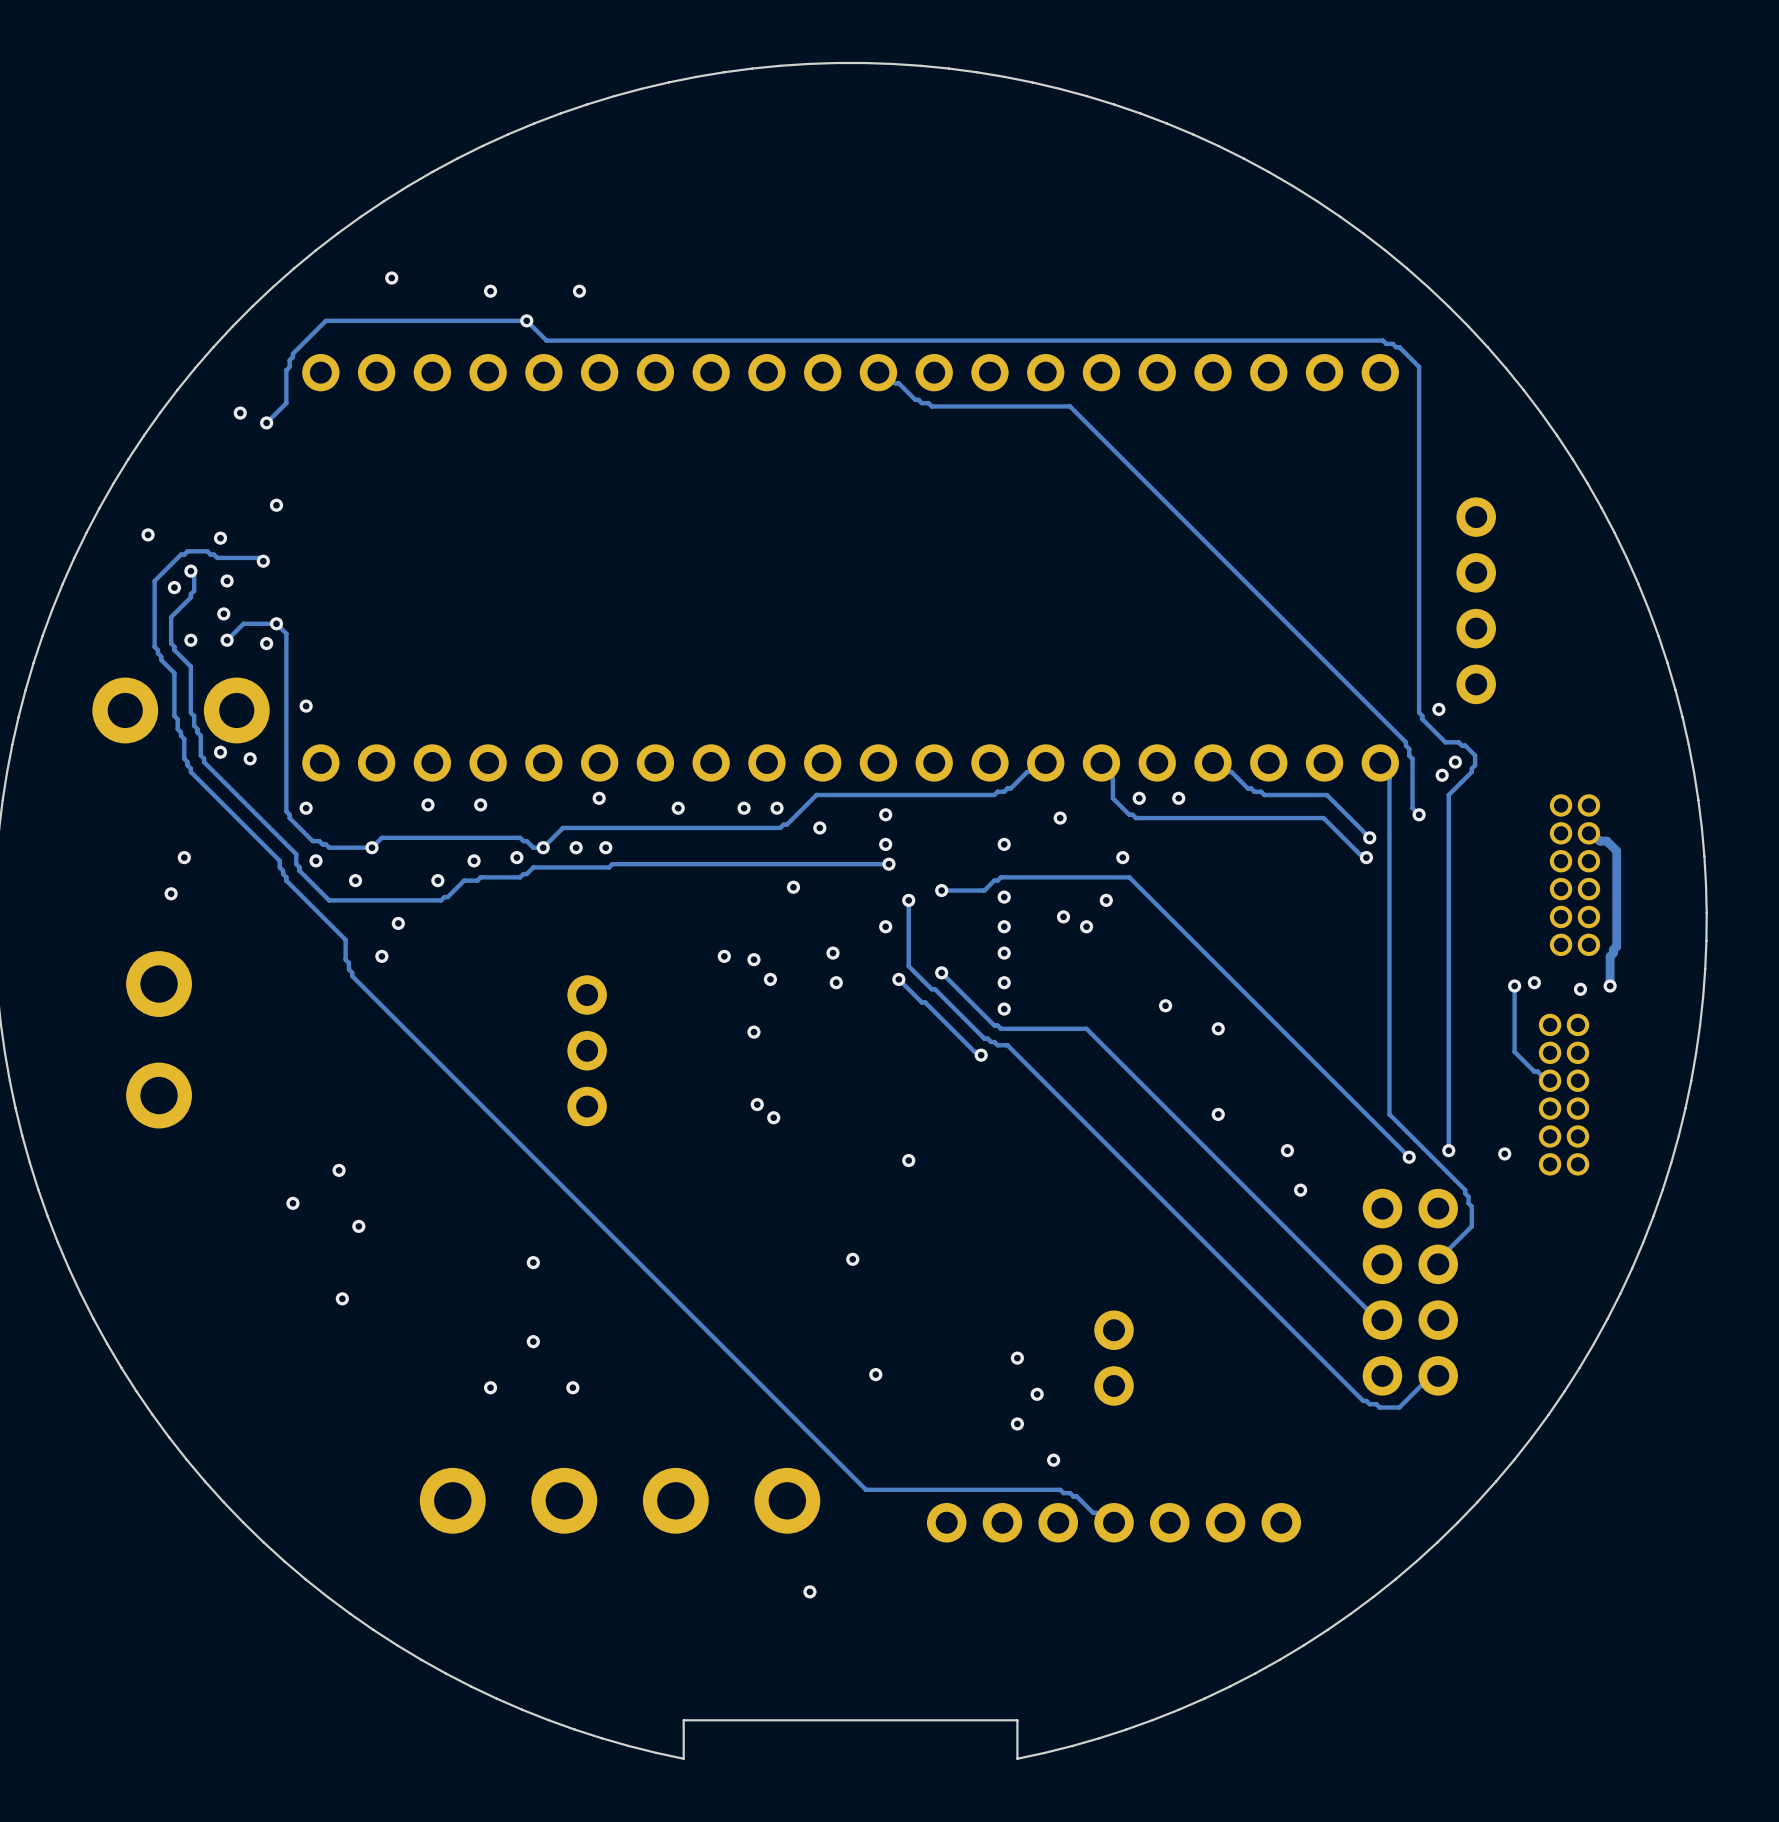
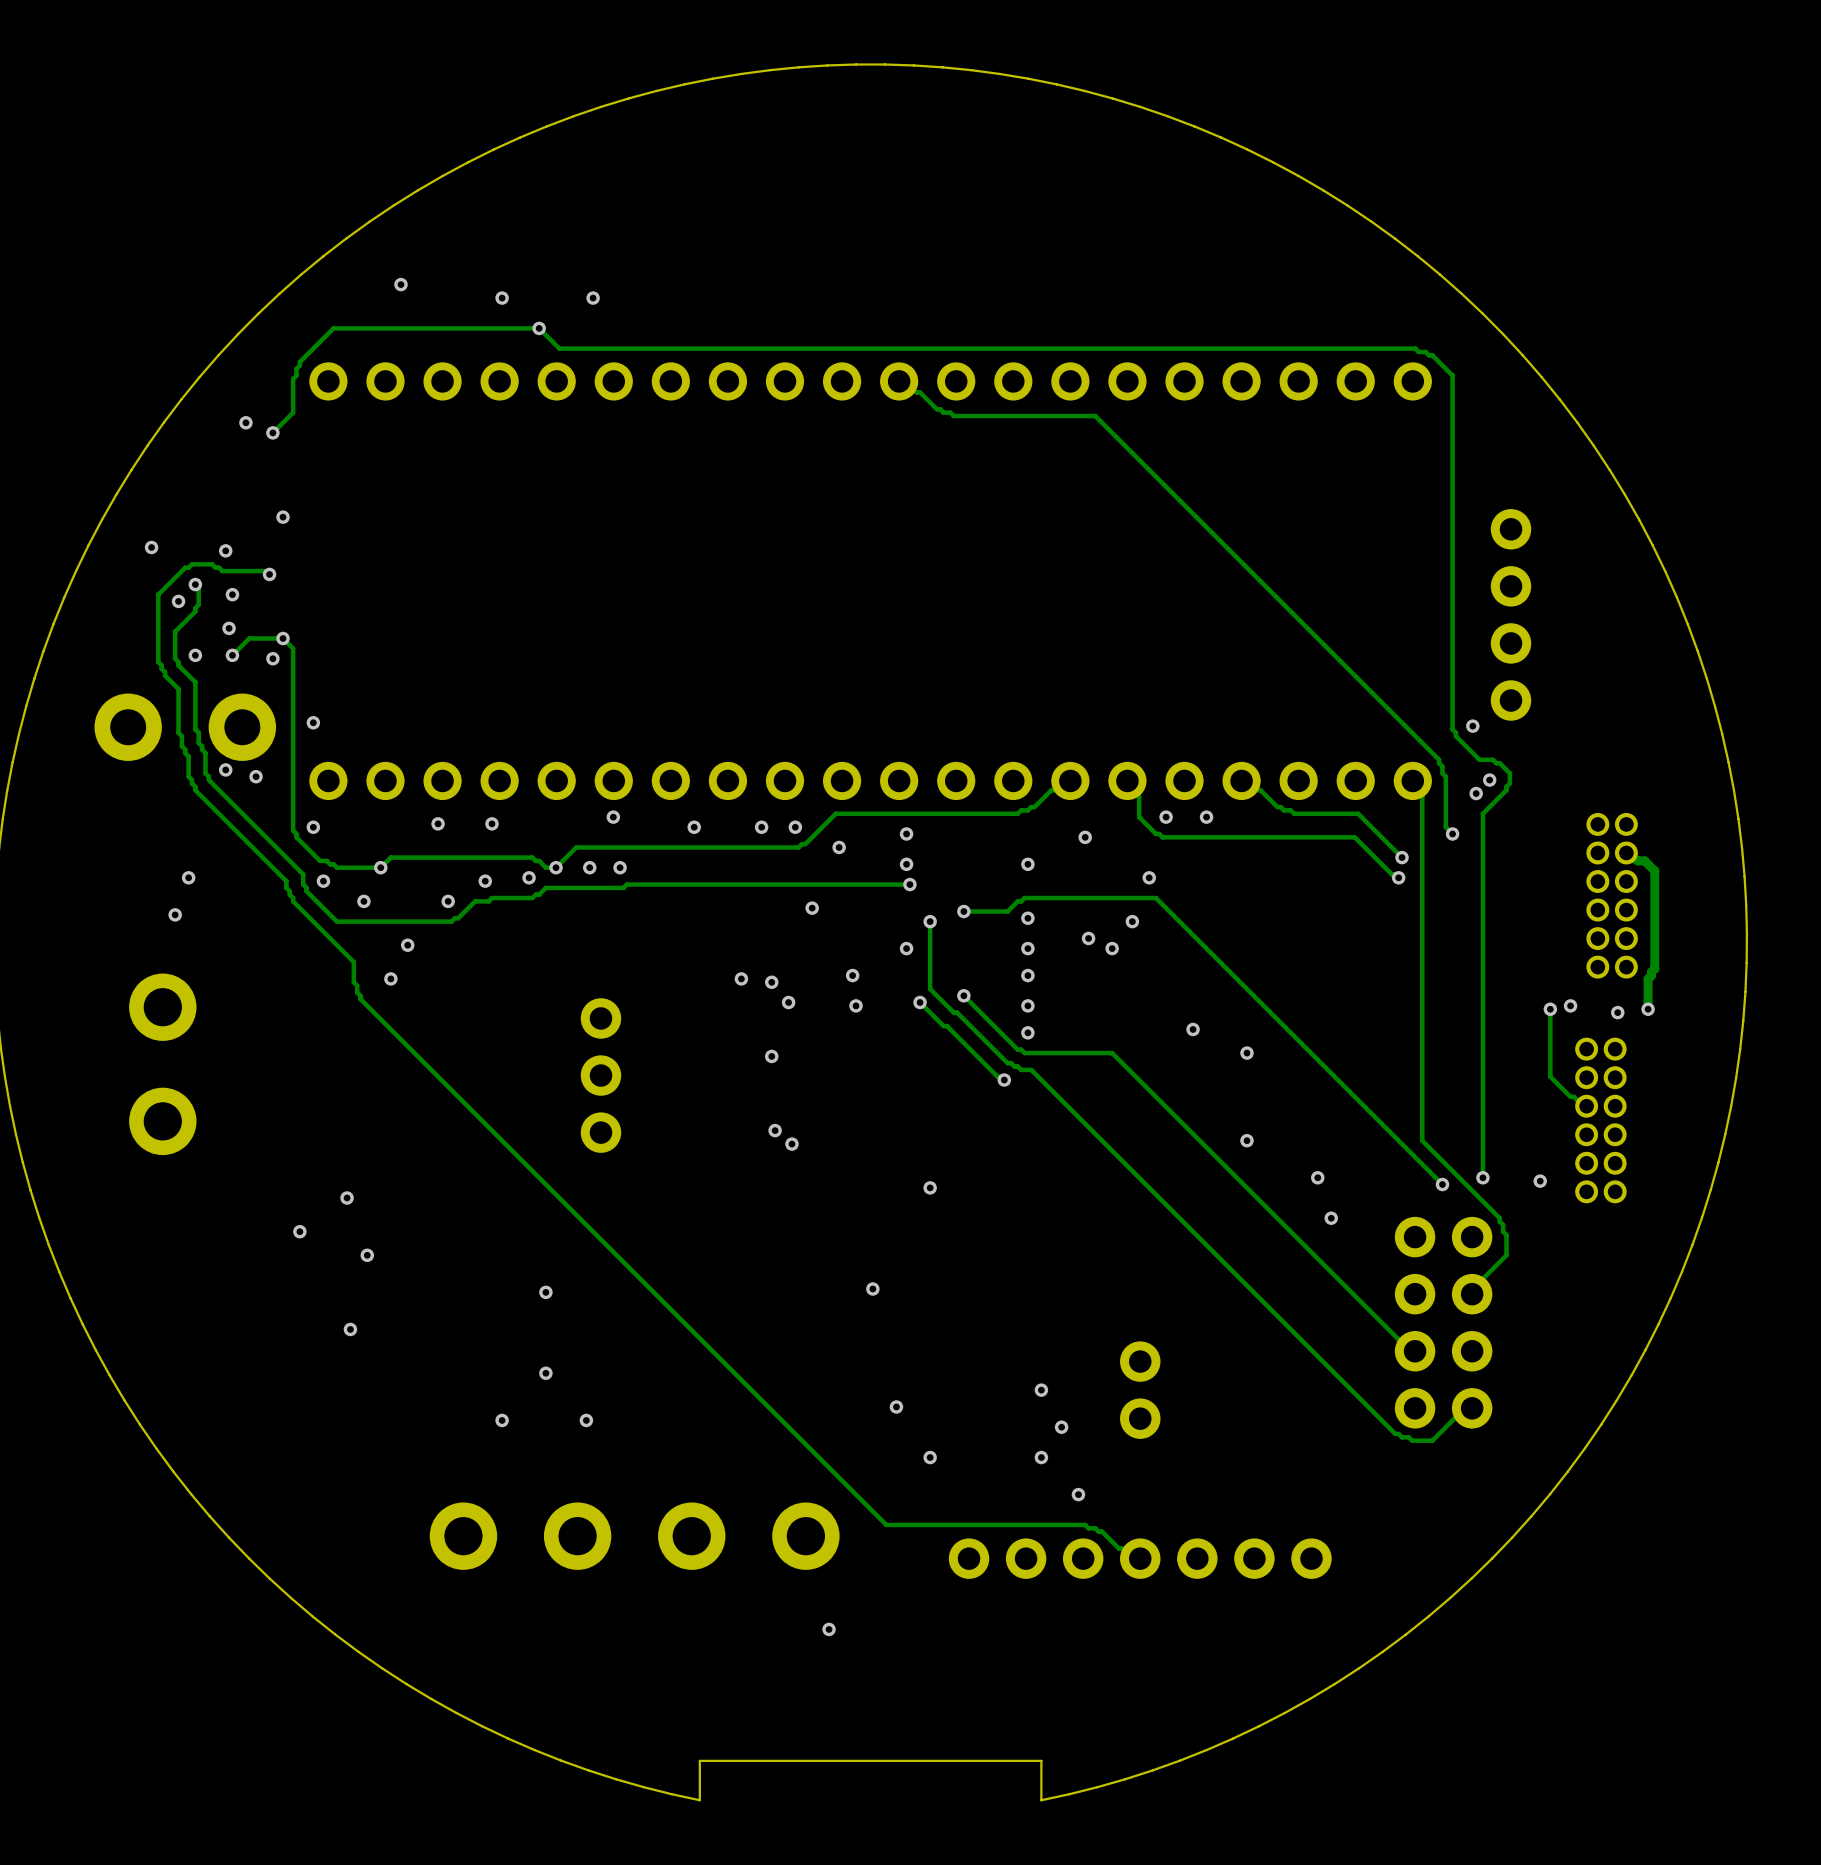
via: none -> (930, 1457)

